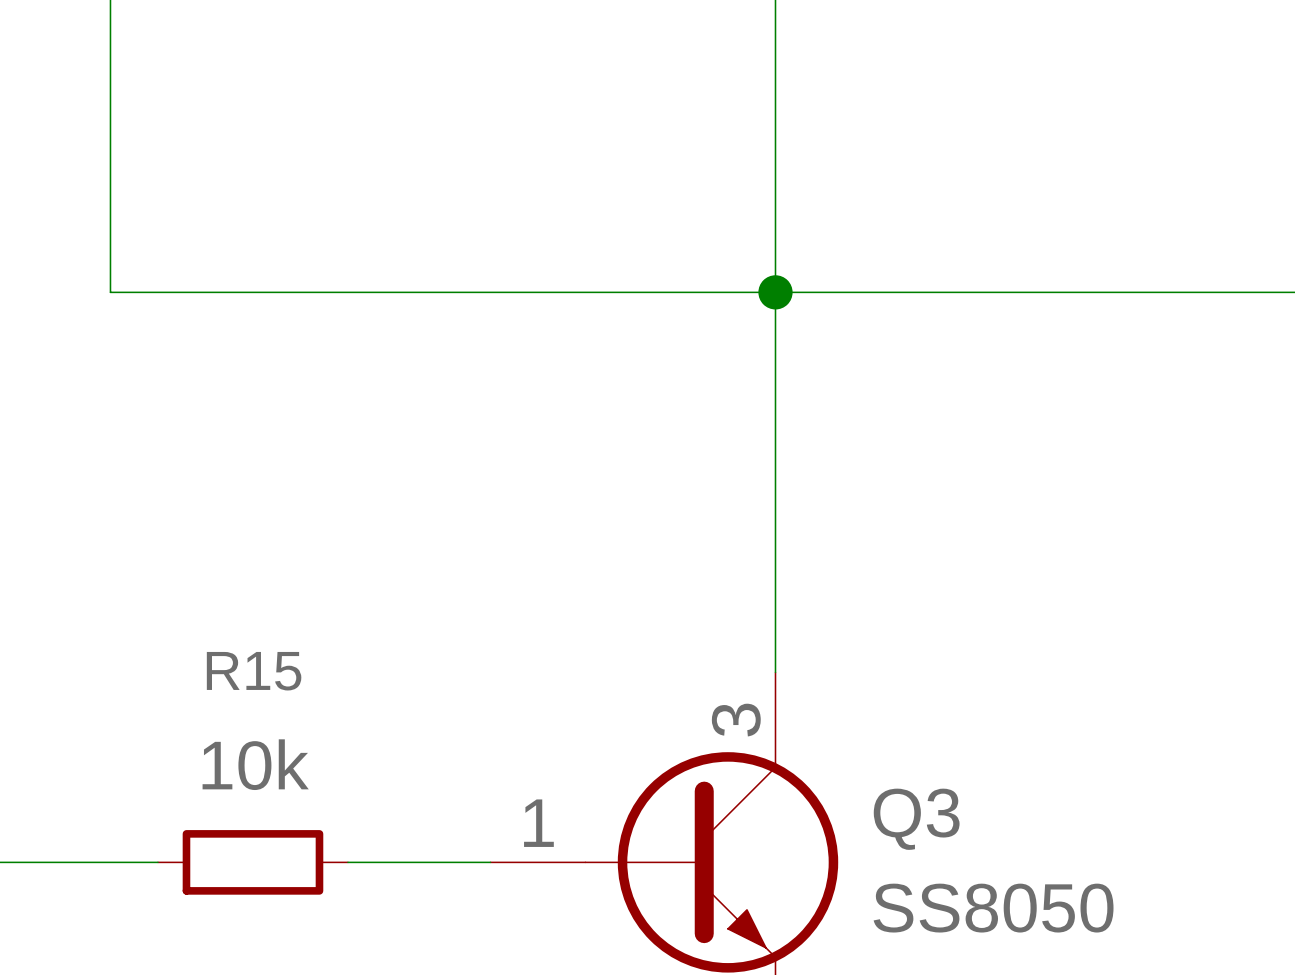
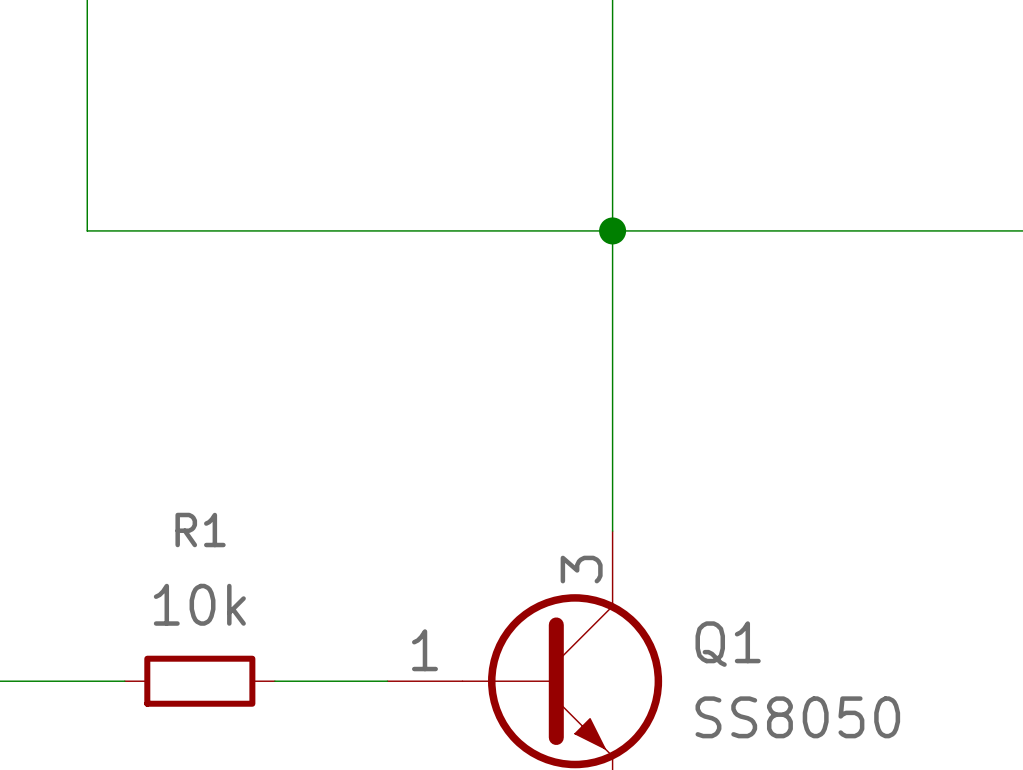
R15 name: R15 (254, 671) -> R1 (200, 530)
Q3 name: Q3 (916, 819) -> Q1 (728, 644)

